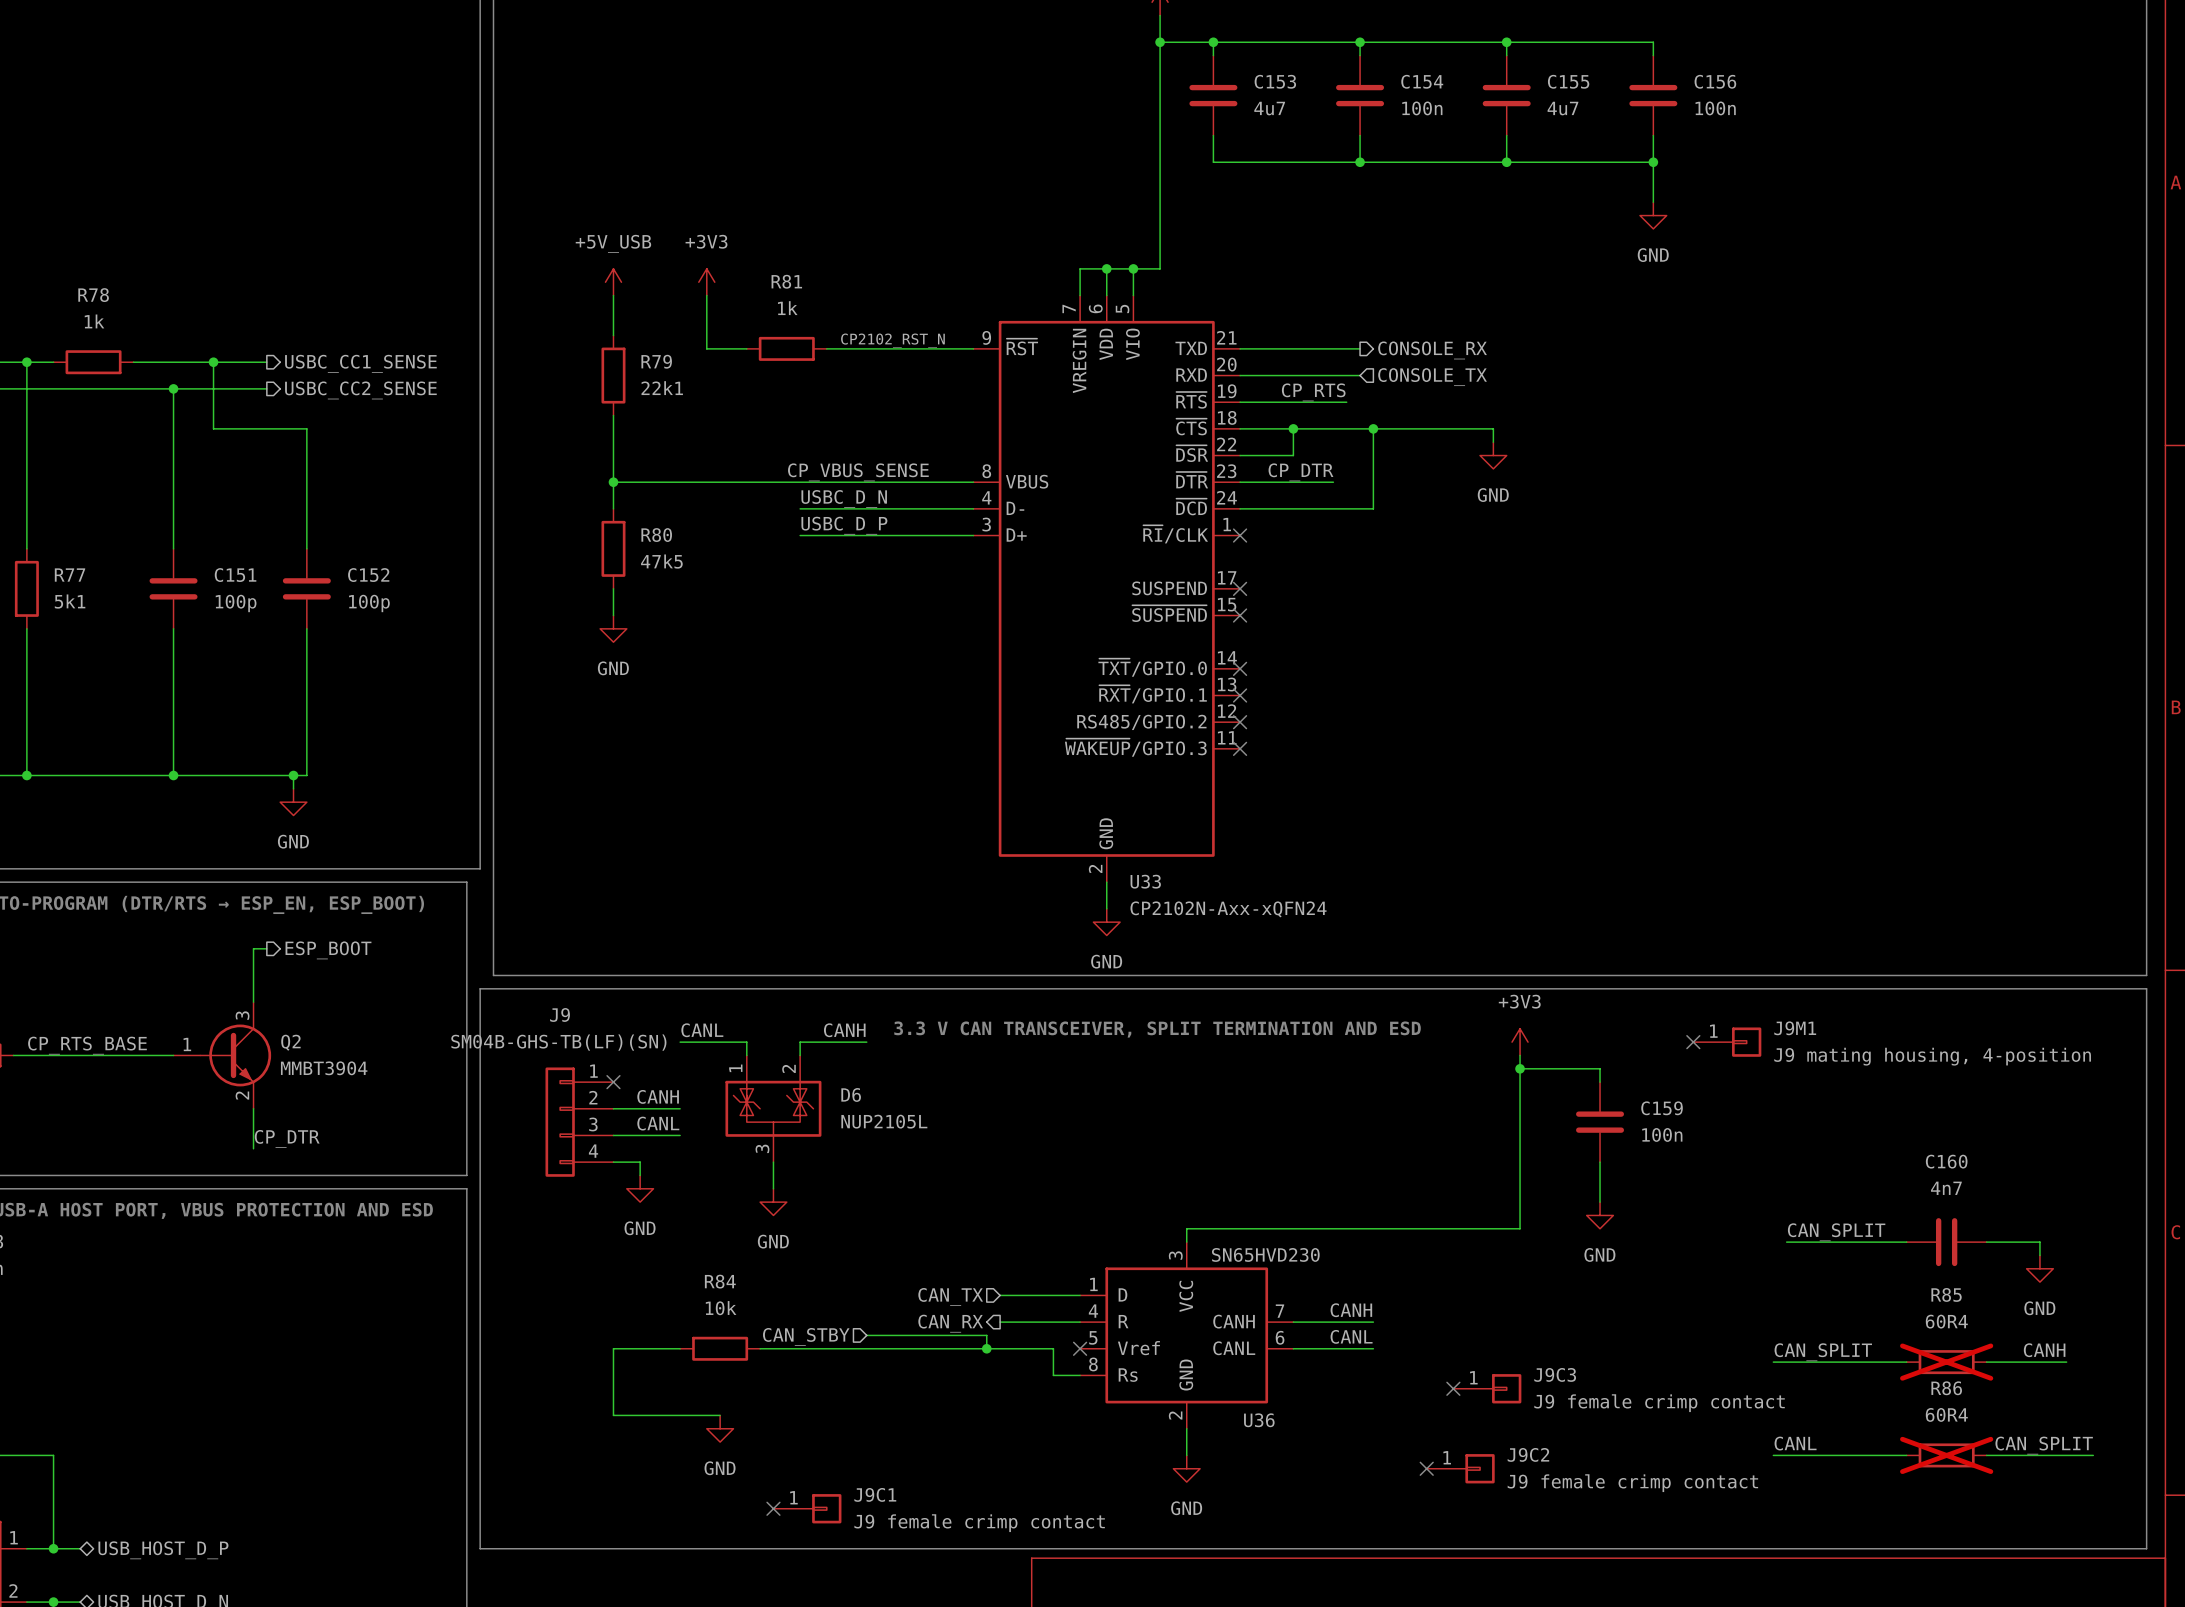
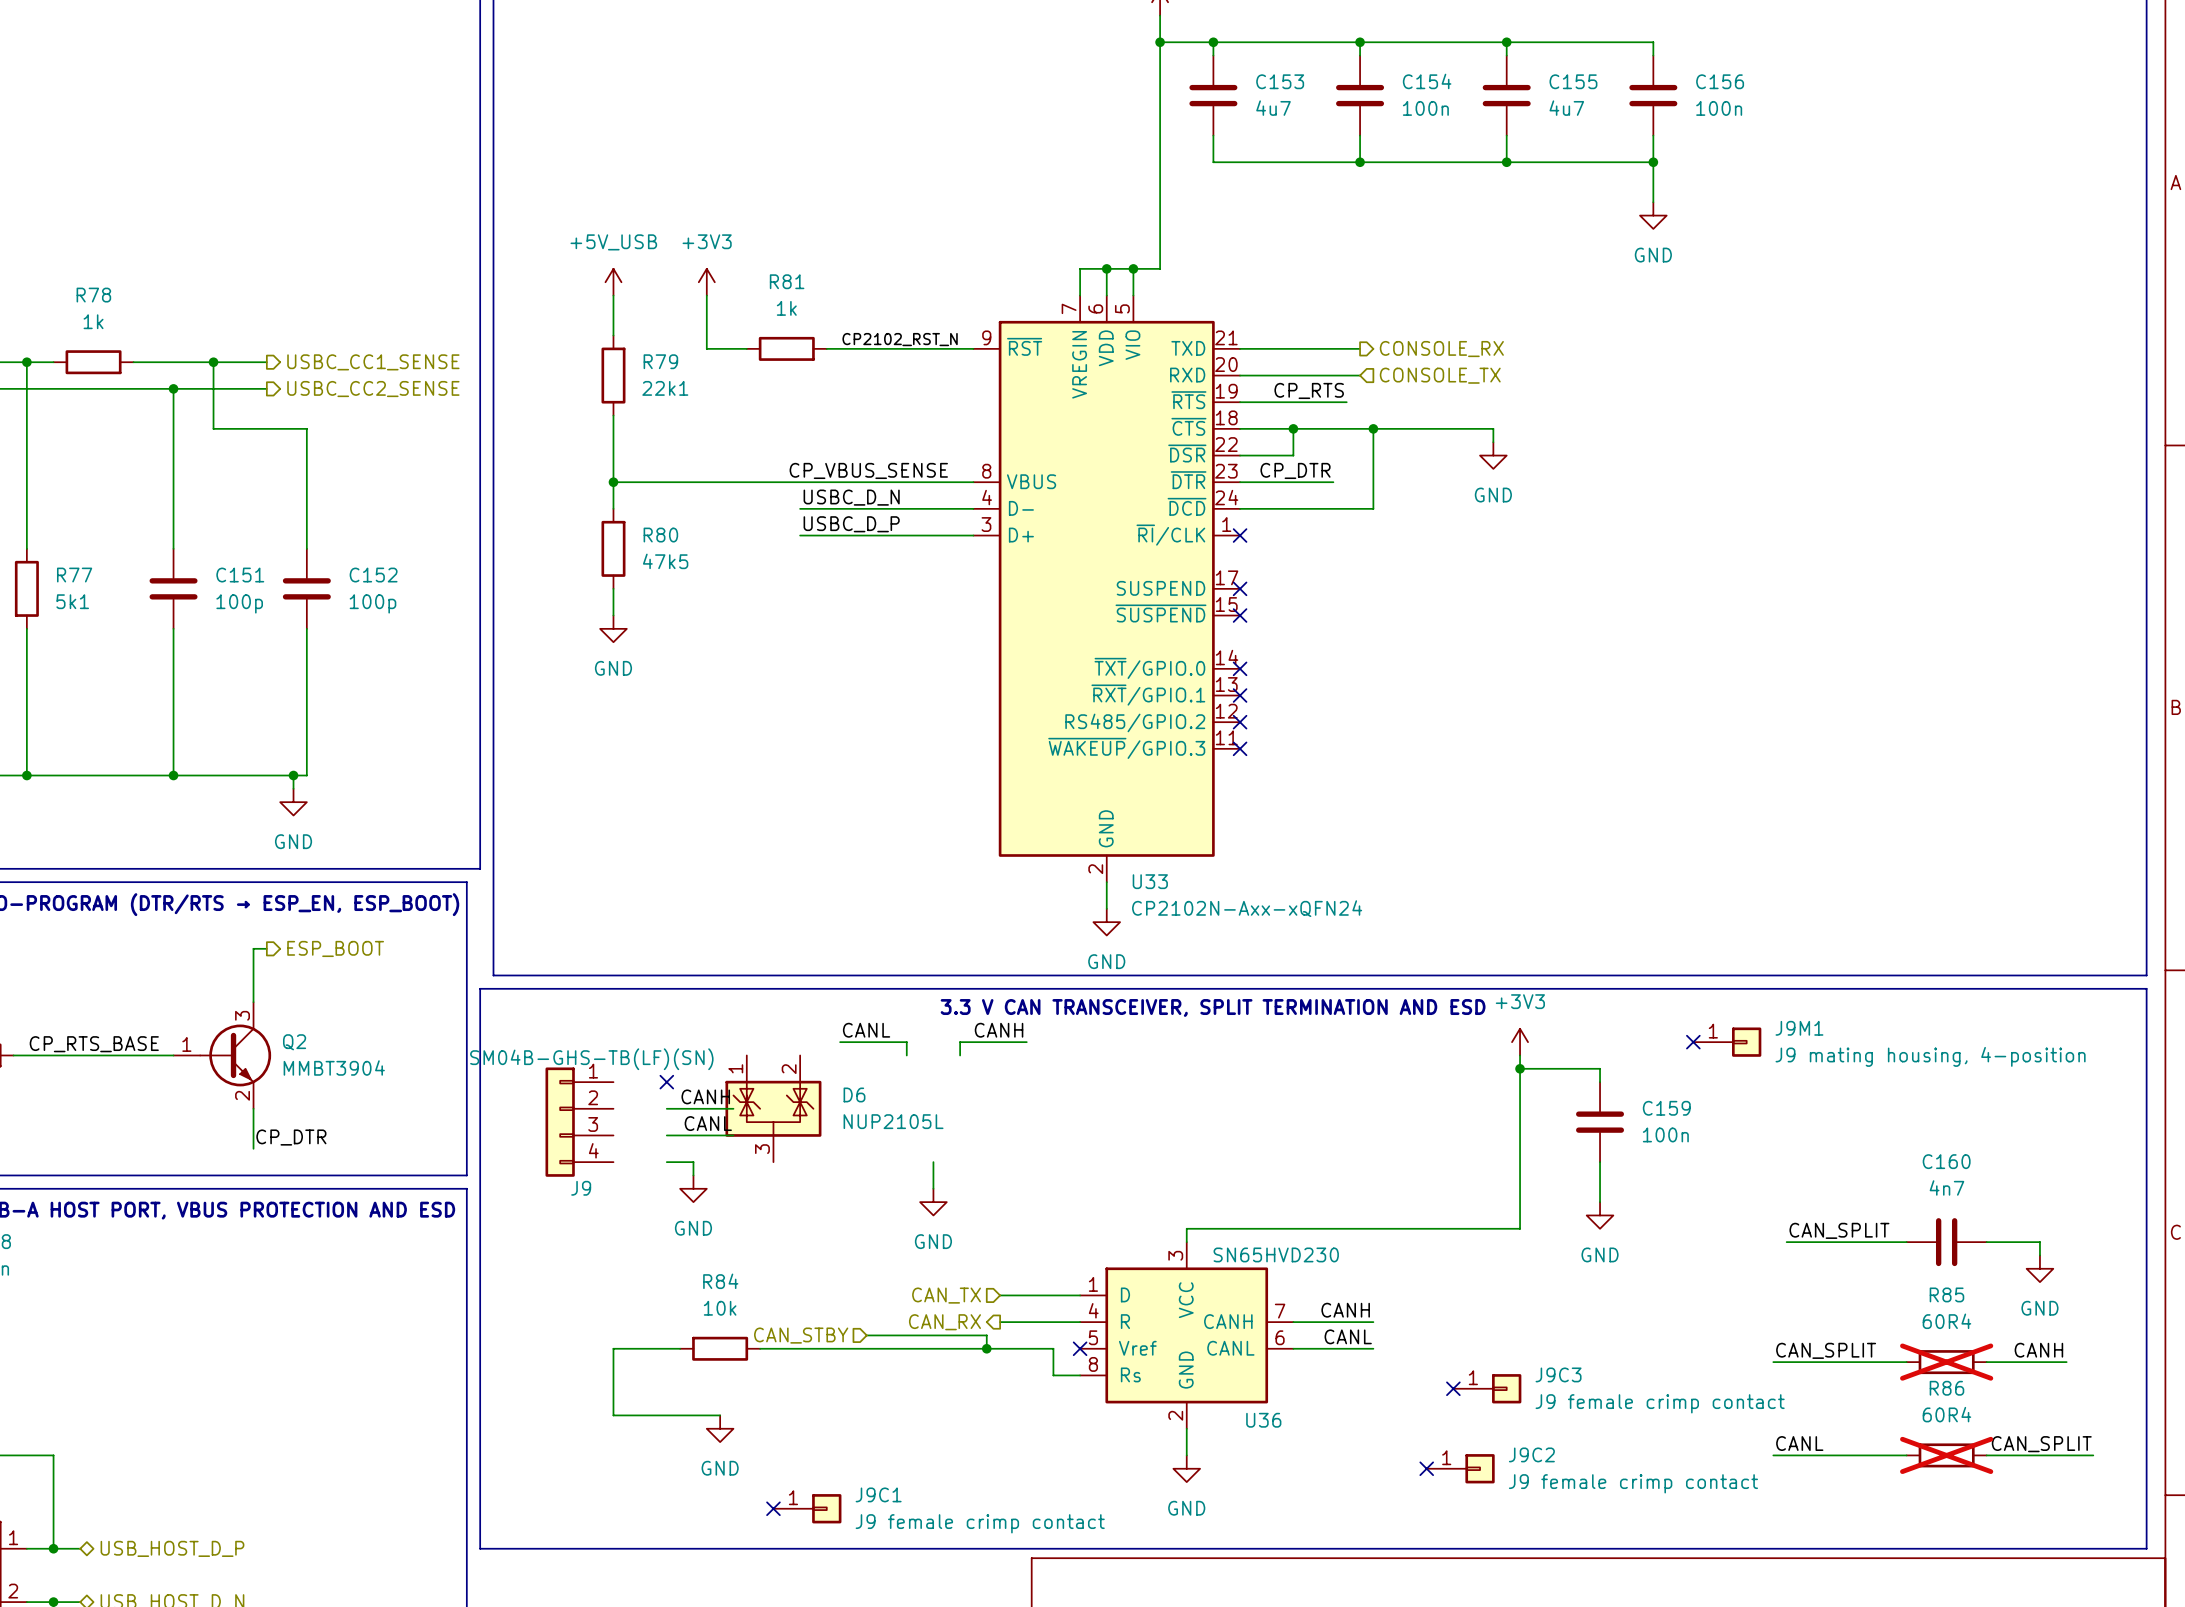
J9 name position: J9 (560, 1014) -> J9 (581, 1188)
text position: 3.3 V CAN TRANSCEIVER, SPLIT TERMINATION AND ESD (1157, 1029) -> 3.3 V CAN TRANSCEIVER, SPLIT TERMINATION AND ESD (1213, 1007)
label: CANL (702, 1030) -> none
label: CANH (844, 1030) -> CANL (866, 1030)
label: none -> CANH (999, 1030)
J9 value position: SM04B-GHS-TB(LF)(SN) (558, 1042) -> SM04B-GHS-TB(LF)(SN) (591, 1059)
wire: (680, 1042) (746, 1042) (746, 1055) -> none
wire: (840, 1042) (800, 1042) (800, 1055) -> none
wire: none -> (866, 1042) (906, 1042) (906, 1055)
wire: none -> (1026, 1042) (960, 1042) (960, 1055)
no-connect mark position: (613, 1082) -> (666, 1082)
label position: CANH (658, 1096) -> CANH (705, 1096)
wire: (613, 1108) (666, 1108) -> (680, 1108) (733, 1108)
label position: CANL (658, 1123) -> CANL (708, 1123)
wire: (613, 1135) (666, 1135) -> (680, 1135) (733, 1135)
wire: (613, 1162) (640, 1162) (640, 1175) -> (666, 1162) (693, 1162) (693, 1175)
wire: (773, 1162) (773, 1188) -> (933, 1162) (933, 1188)
power symbol: GND (640, 1188) -> none
power symbol: none -> GND (693, 1188)
power symbol: GND (773, 1202) -> none
power symbol: none -> GND (933, 1202)

